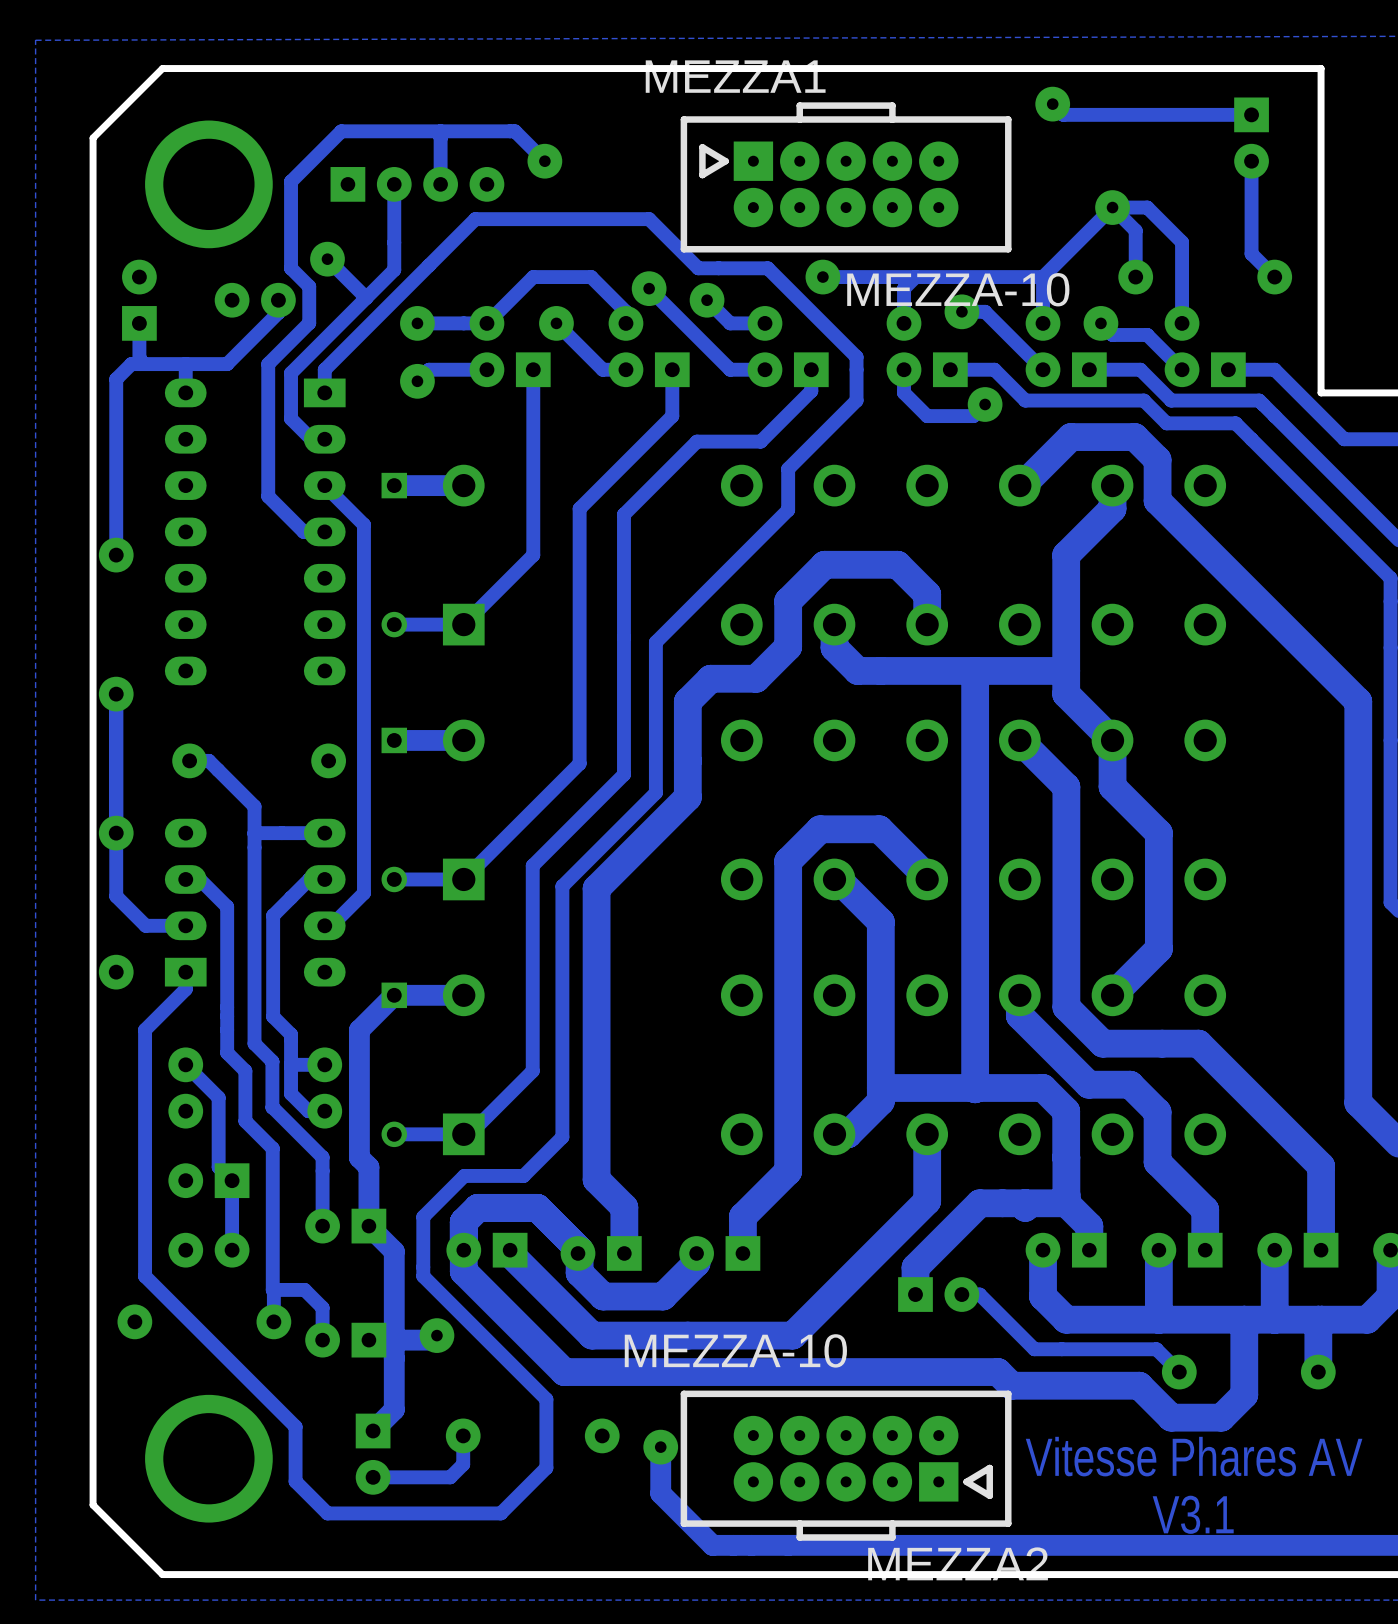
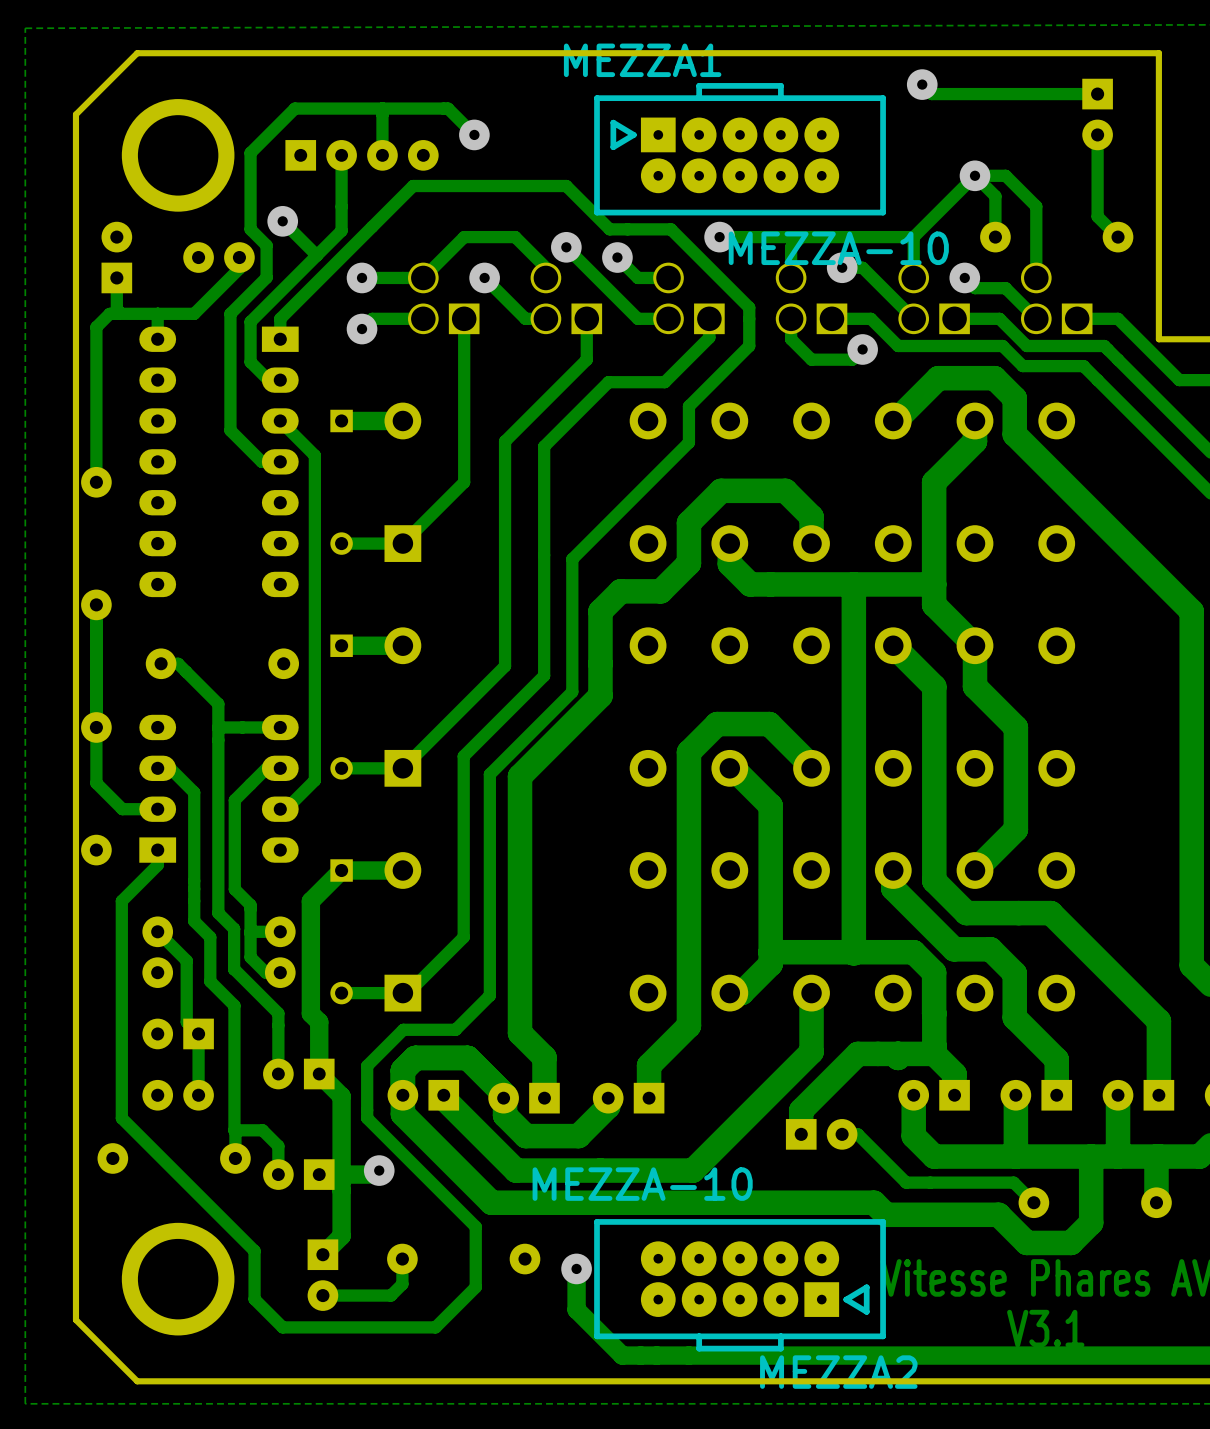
part footprint: [469, 306, 551, 388] -> [408, 262, 480, 335]
part footprint: [608, 306, 690, 388] -> [530, 262, 603, 335]
part footprint: [747, 306, 829, 388] -> [653, 262, 725, 335]
part footprint: [886, 306, 968, 388] -> [775, 262, 848, 335]
part footprint: [1025, 306, 1107, 388] -> [898, 262, 970, 335]
part footprint: [1164, 306, 1246, 388] -> [1020, 262, 1093, 335]

